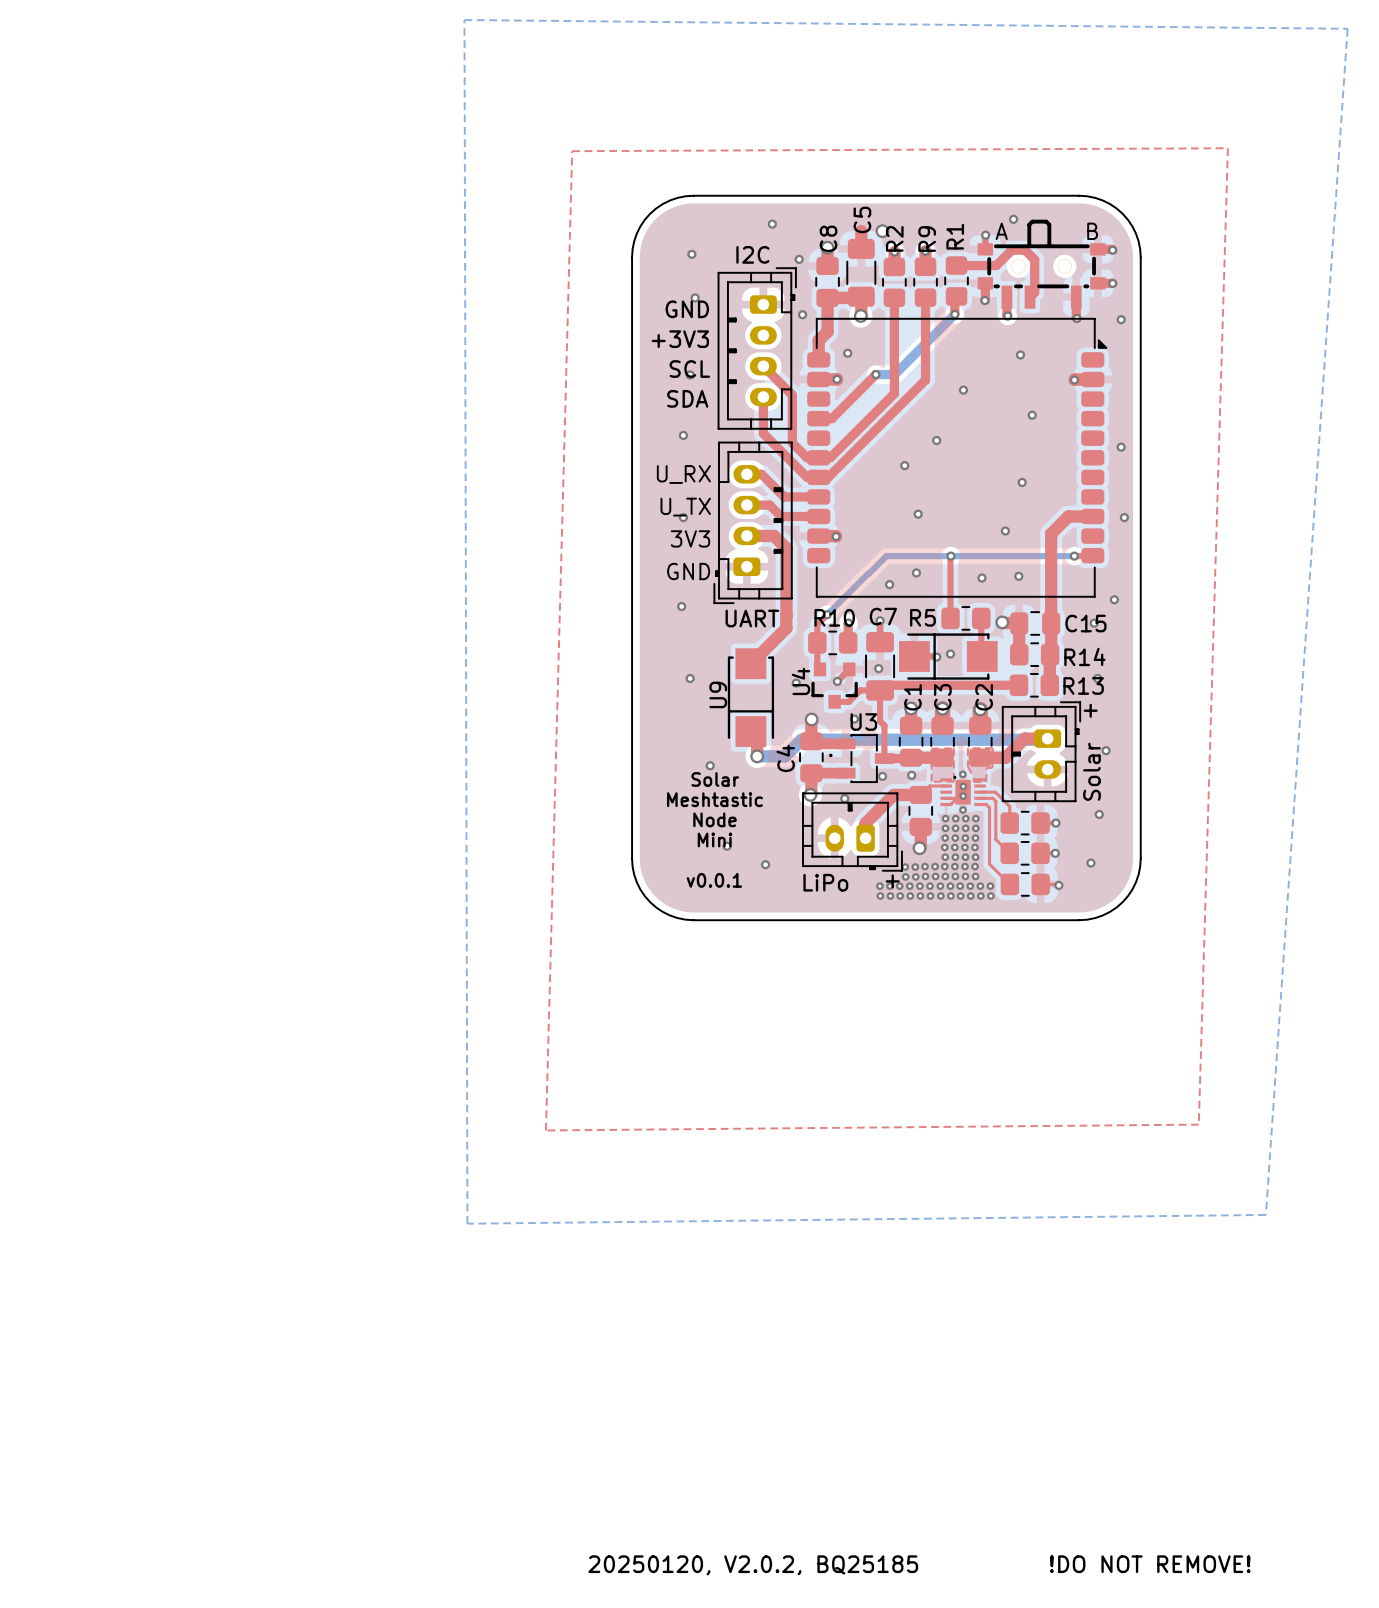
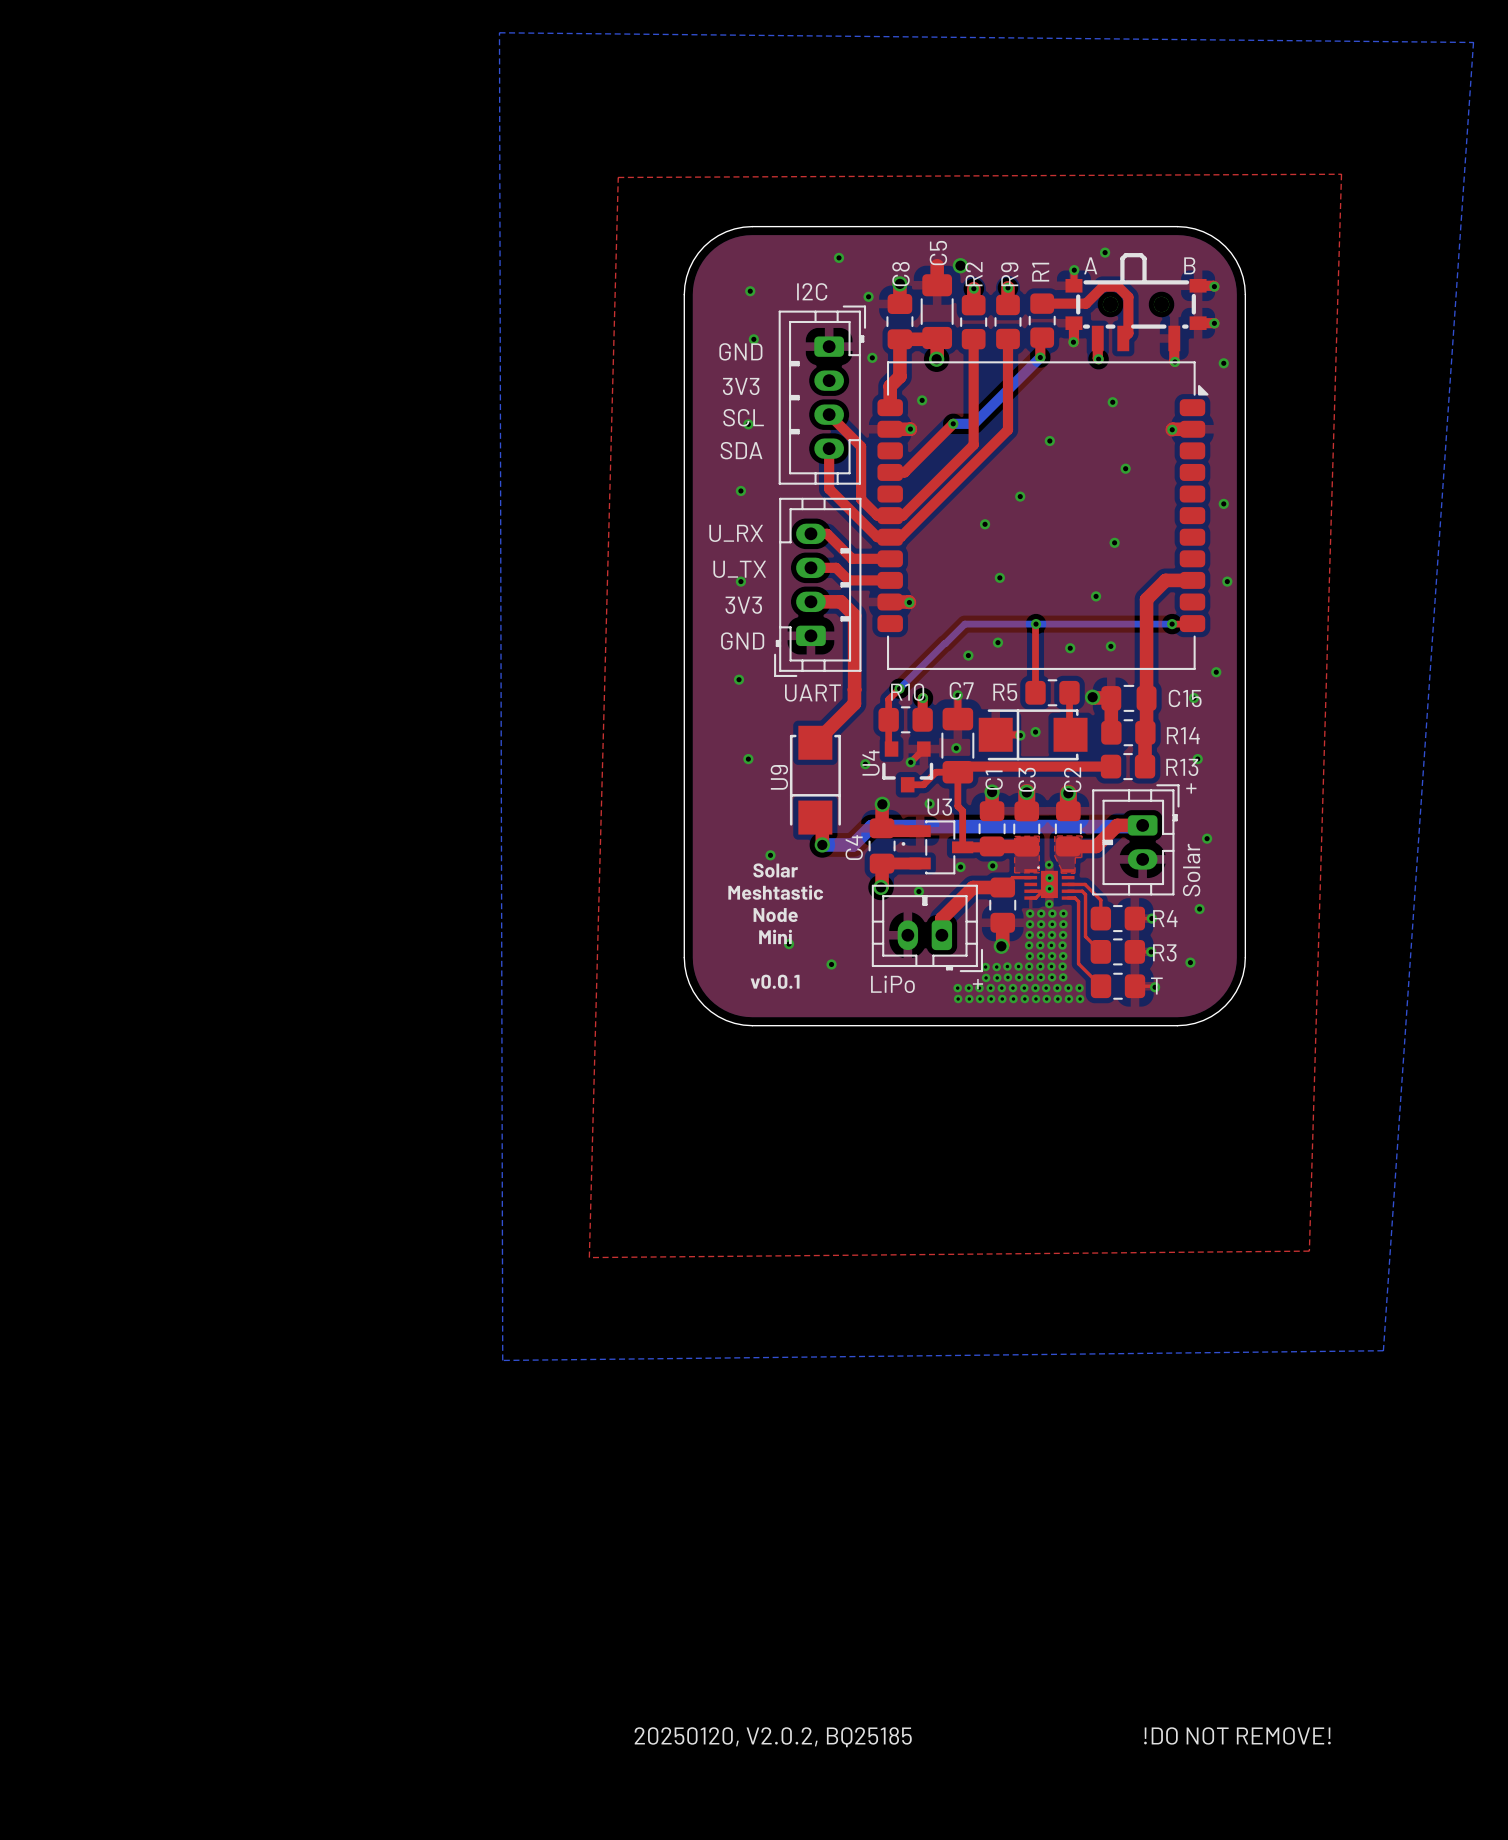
text: +3V3 (680, 339) -> 3V3 (741, 386)
R4 name: none -> R4 (1165, 918)
R3 name: none -> R3 (1164, 952)
text: none -> T (1156, 986)

